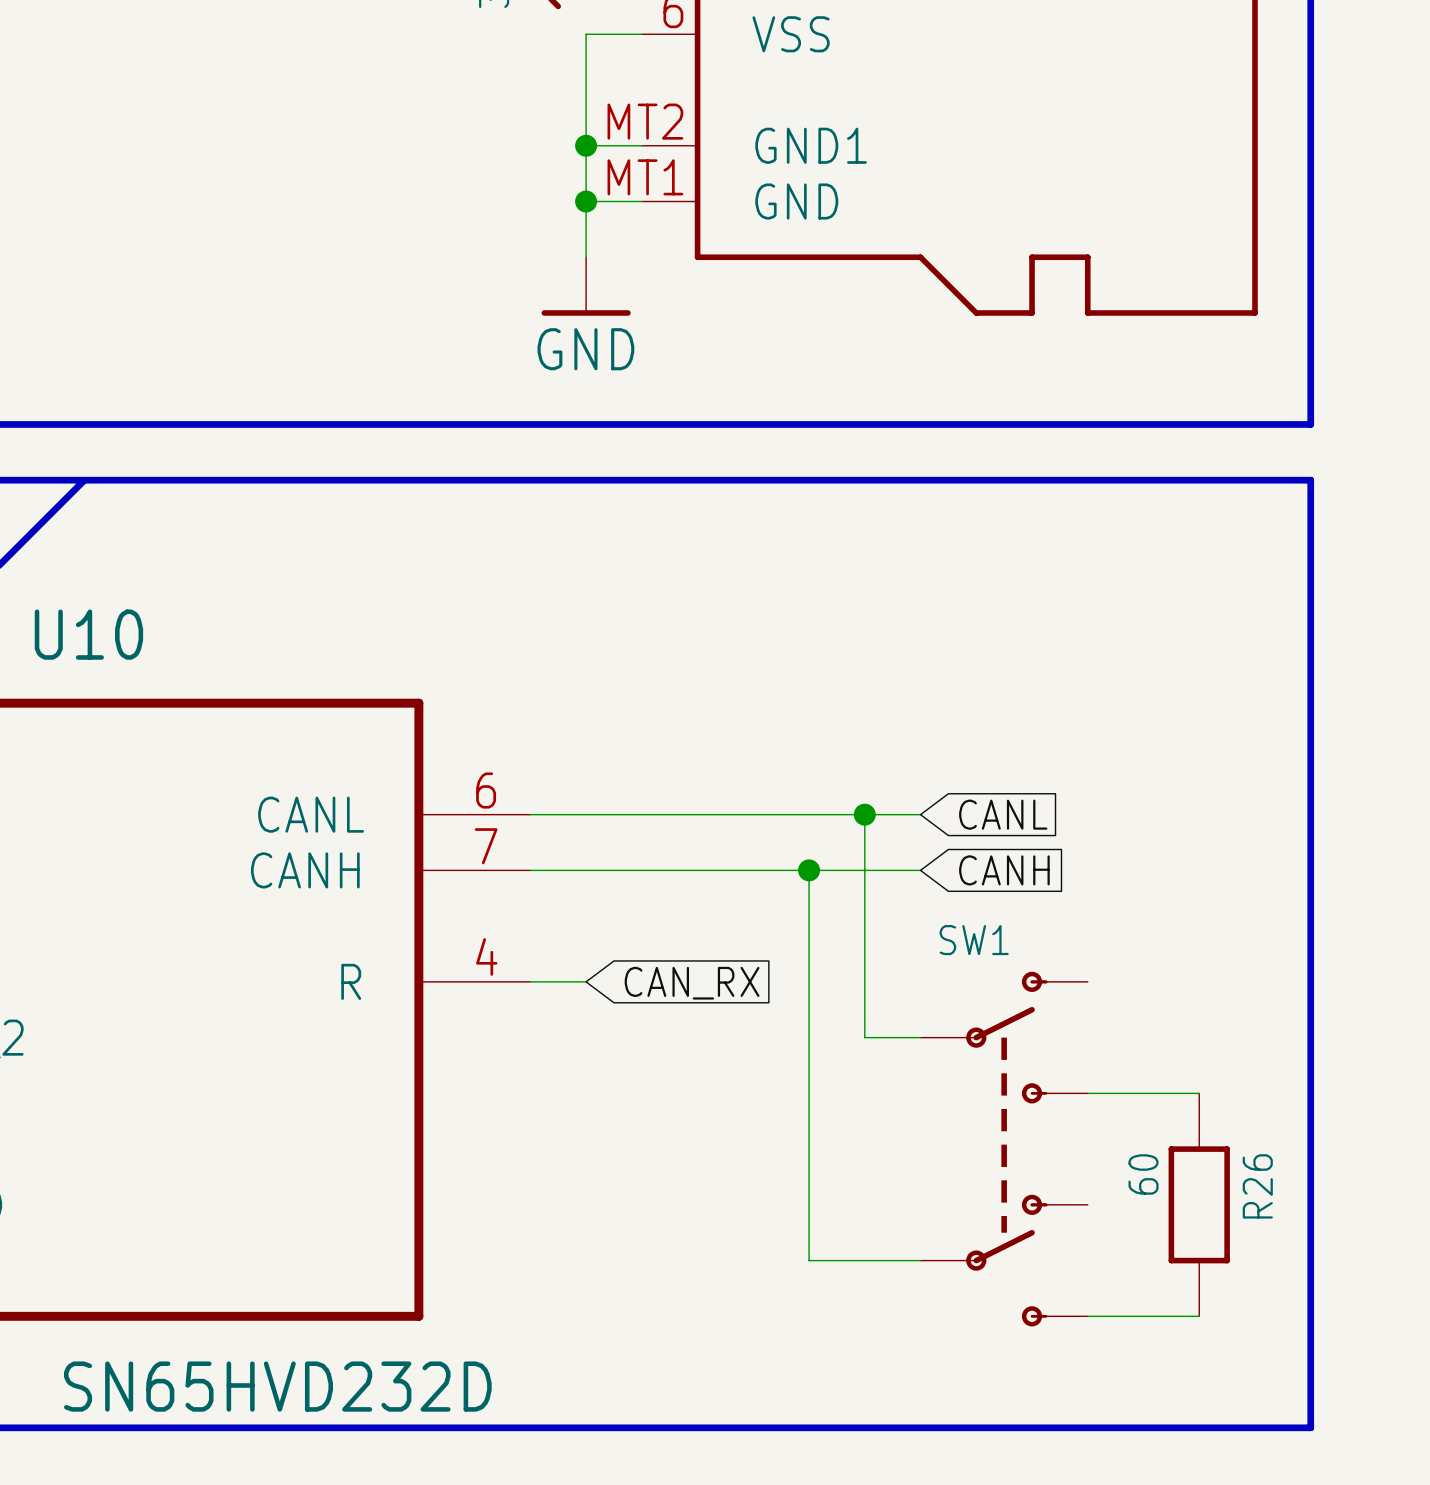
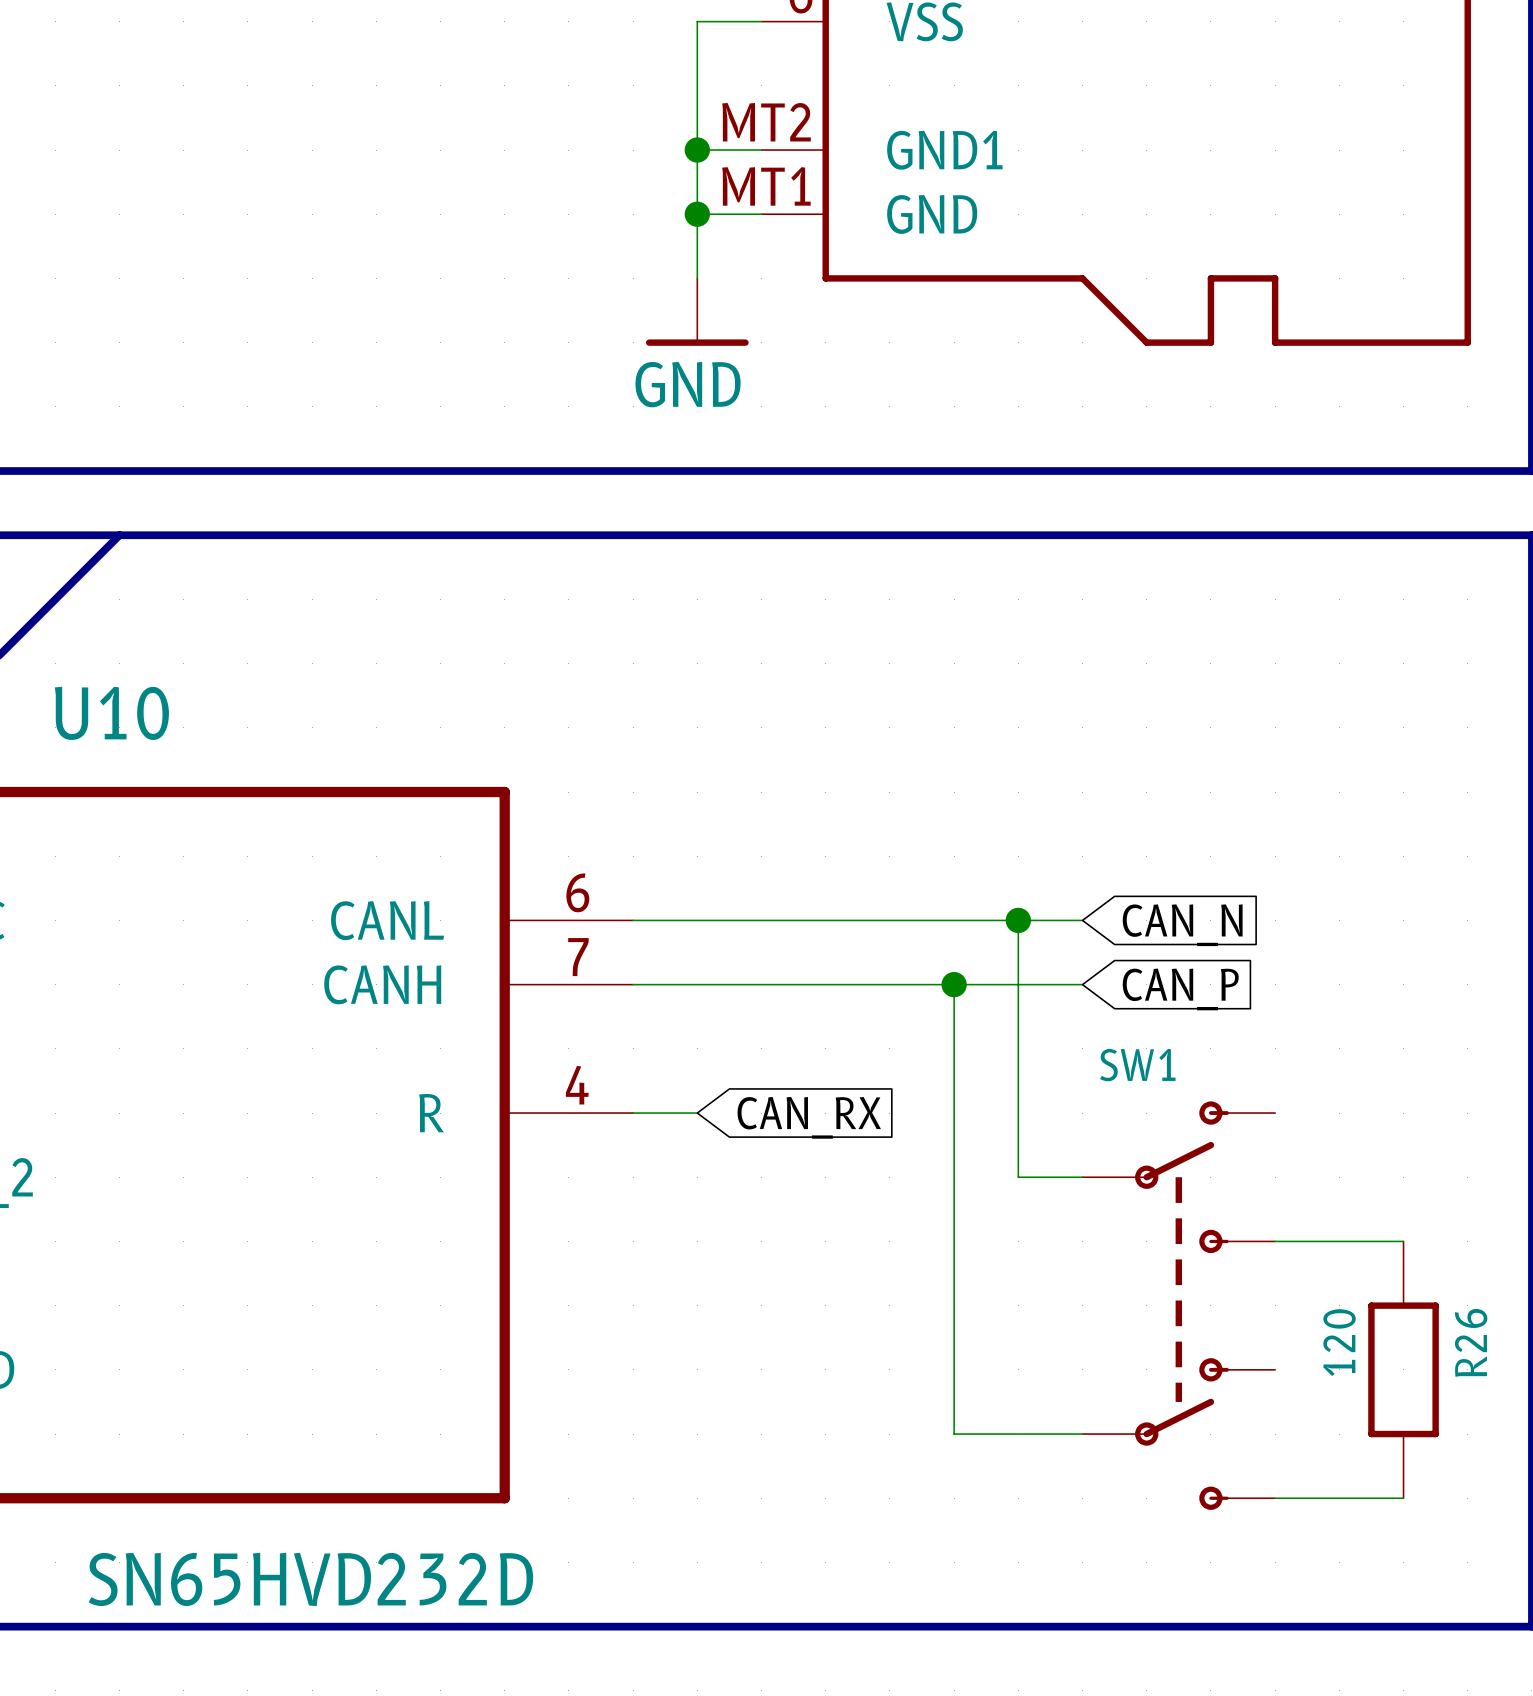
global label: CANL (1003, 814) -> CAN_N (1182, 925)
global label: CANH (1004, 870) -> CAN_P (1180, 989)
R26 value: 60 (1143, 1174) -> 120 (1339, 1342)

